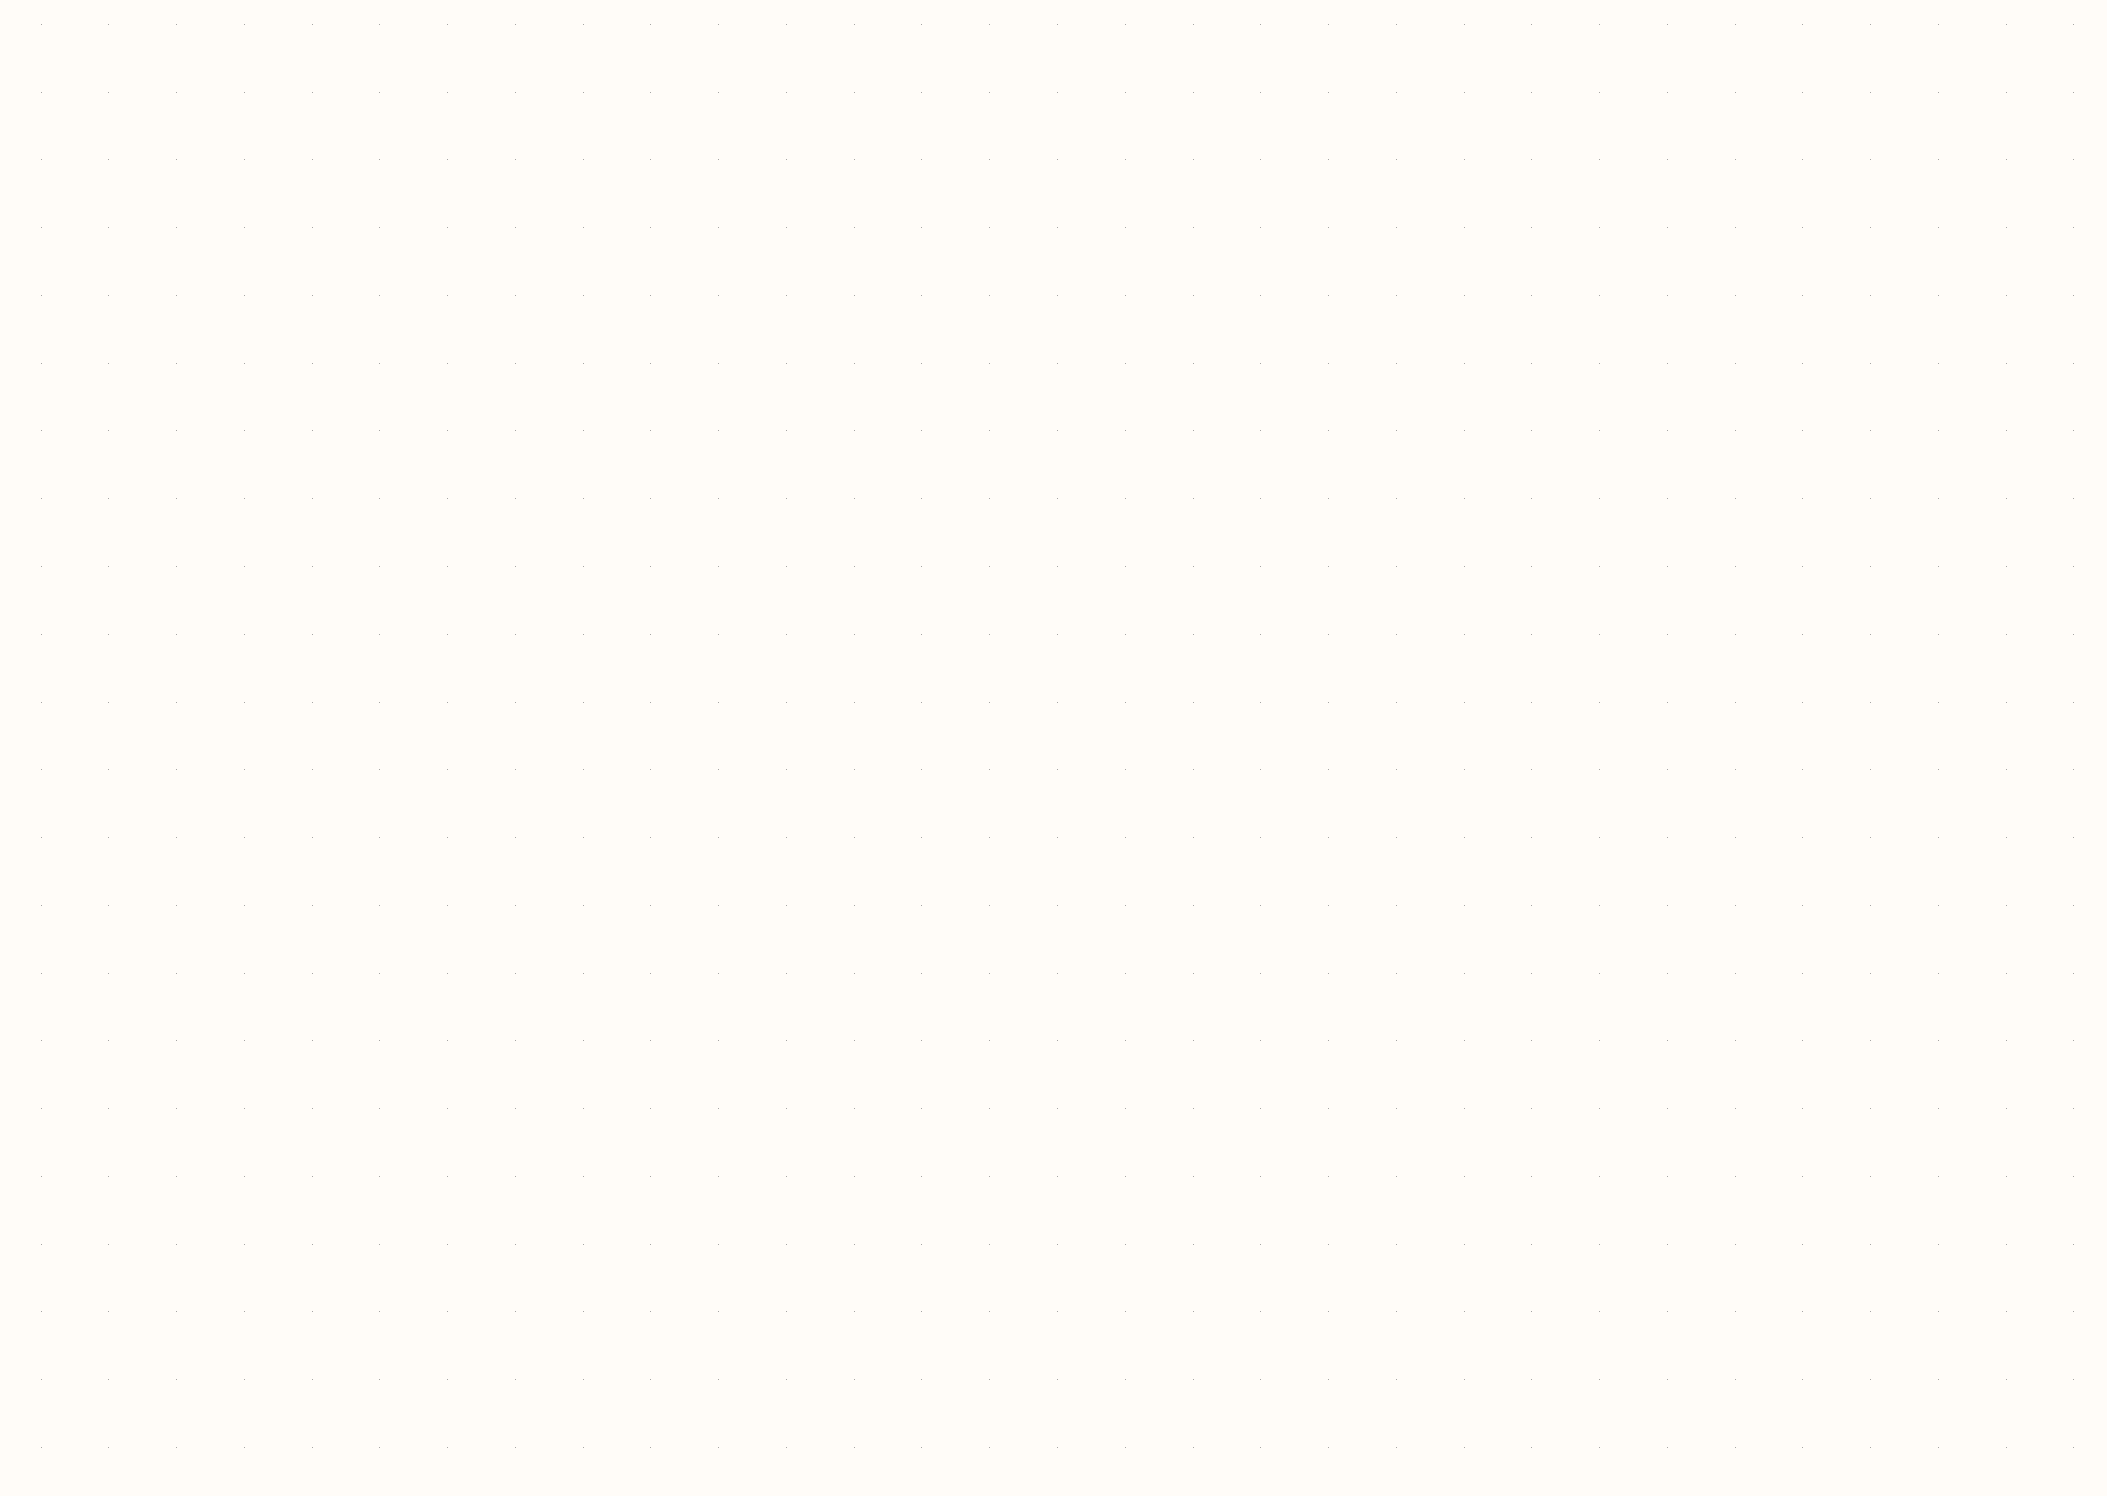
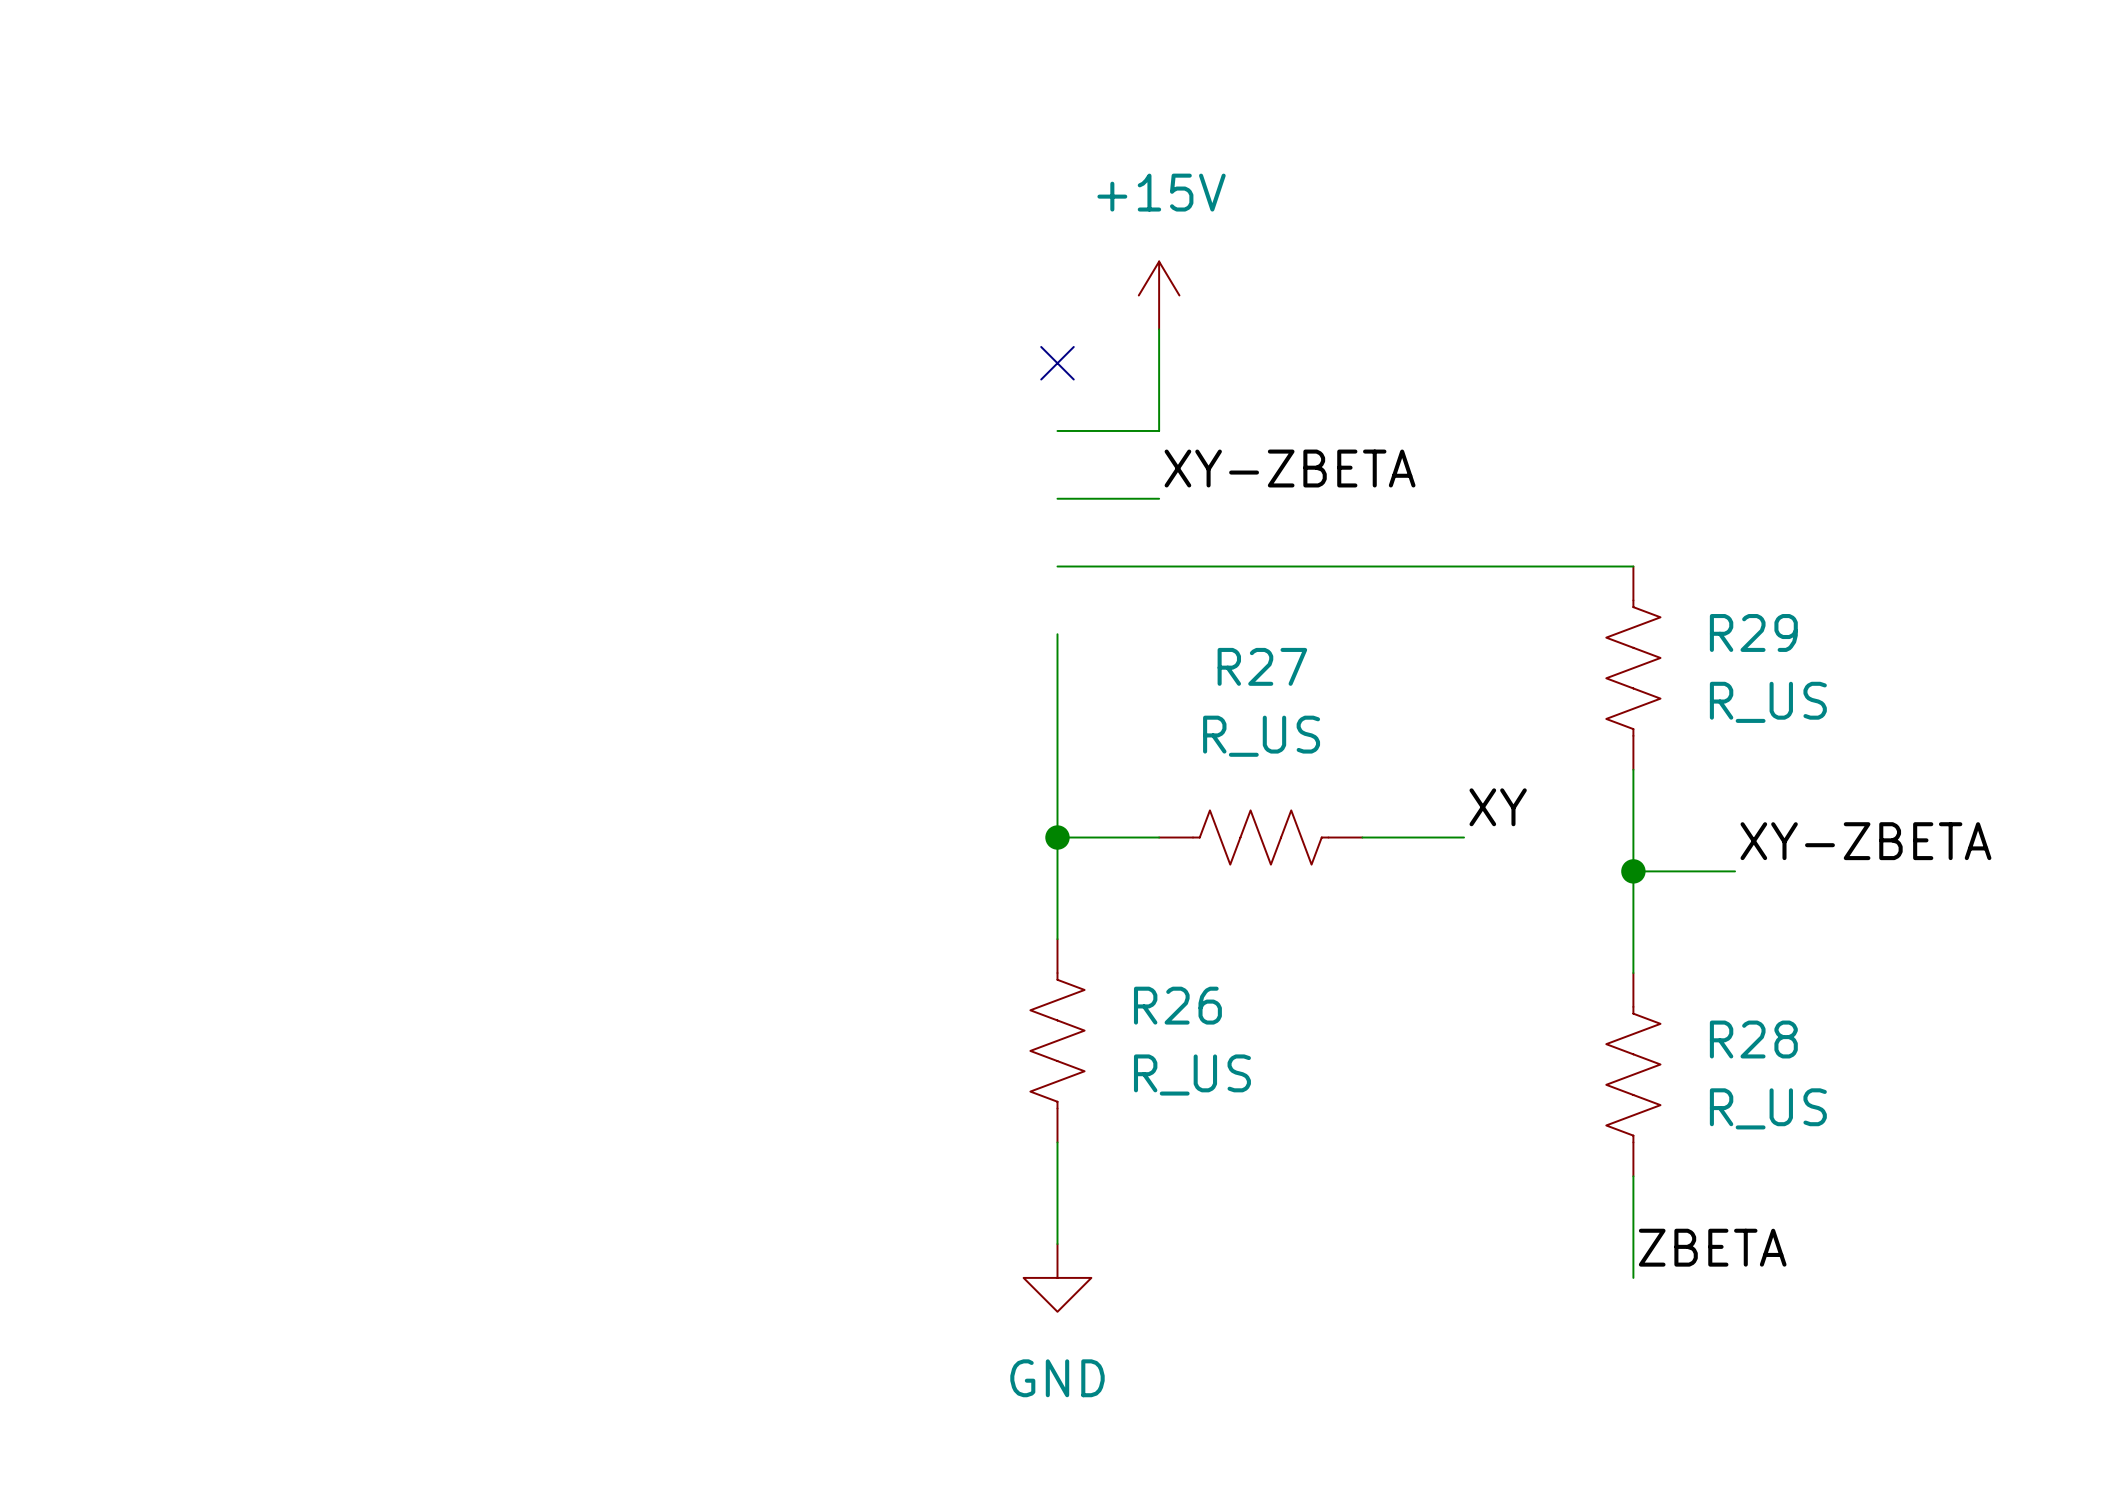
power symbol: none -> +15V (1159, 295)
wire: none -> (1159, 329) (1159, 430) (1057, 430)
no-connect mark: none -> (1057, 363)
label: none -> XY-ZBETA (1290, 468)
wire: none -> (1057, 498) (1159, 498)
wire: none -> (1057, 566) (1633, 566)
wire: none -> (1057, 634) (1057, 939)
R29: none -> R_US (1633, 668)
wire: none -> (1633, 769) (1633, 973)
label: none -> XY (1498, 807)
wire: none -> (1057, 837) (1159, 837)
junction: none -> (1057, 837)
R27: none -> R_US (1260, 837)
wire: none -> (1362, 837) (1464, 837)
label: none -> XY-ZBETA (1865, 841)
wire: none -> (1633, 871) (1735, 871)
junction: none -> (1633, 871)
R26: none -> R_US (1057, 1040)
R28: none -> R_US (1633, 1074)
wire: none -> (1057, 1142) (1057, 1244)
wire: none -> (1633, 1176) (1633, 1277)
label: none -> ZBETA (1712, 1247)
power symbol: none -> GND (1057, 1277)

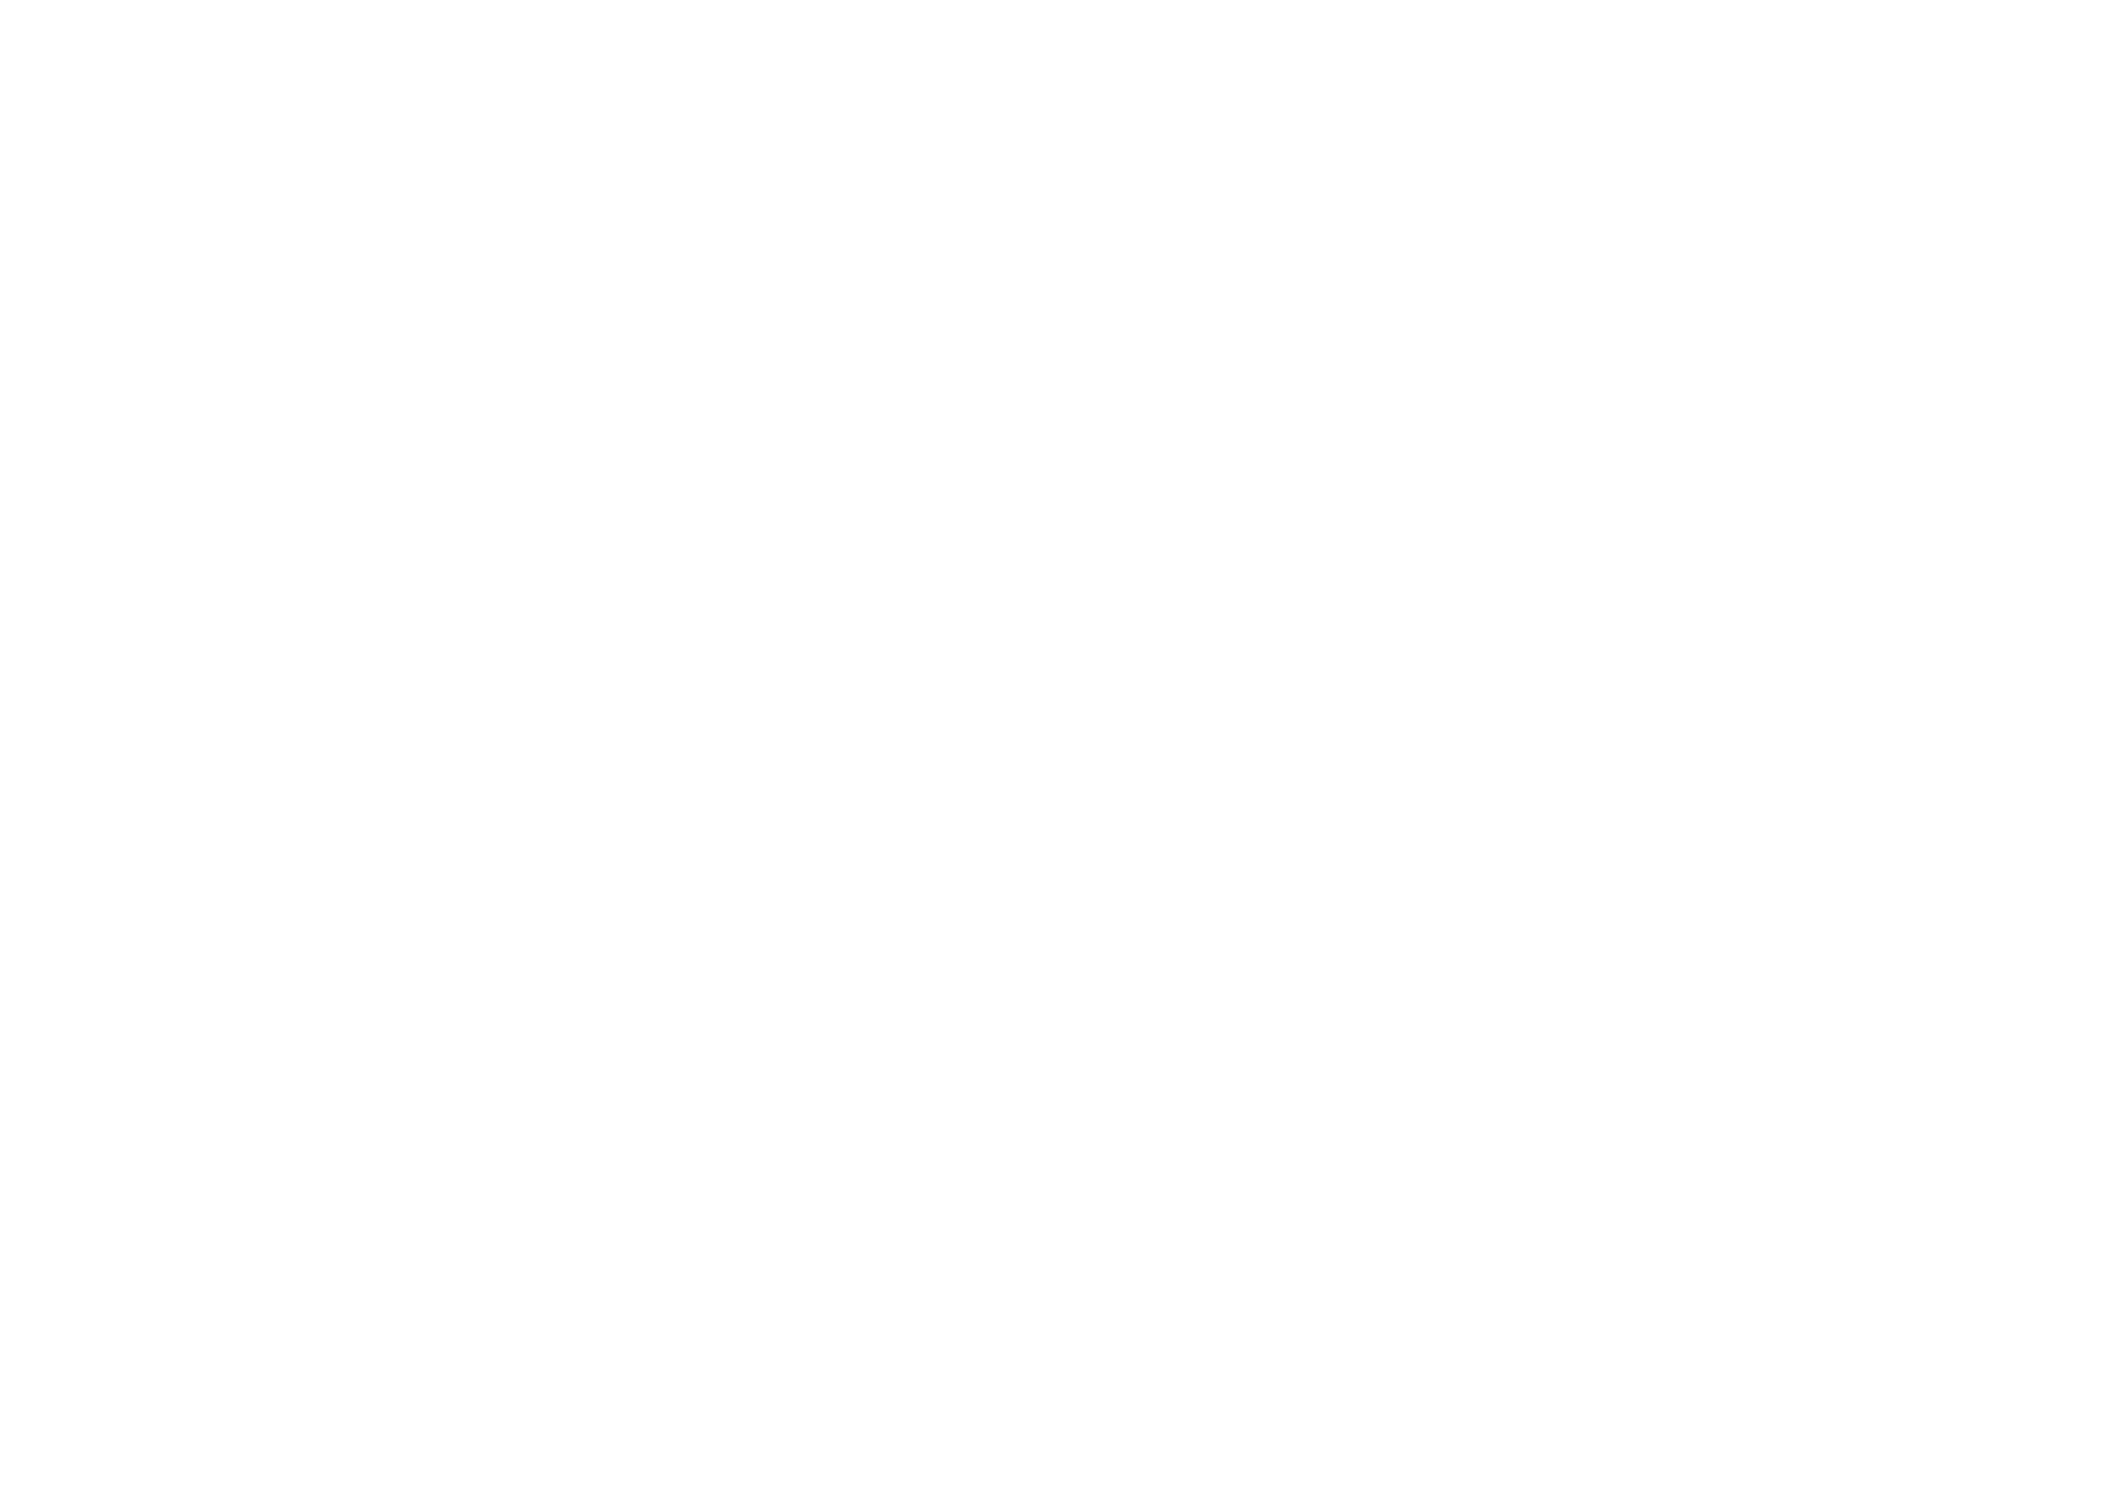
power symbol: +15V (1159, 295) -> none
wire: (1159, 329) (1159, 430) (1057, 430) -> none
no-connect mark: (1057, 363) -> none
label: XY-ZBETA (1290, 468) -> none
wire: (1057, 498) (1159, 498) -> none
wire: (1057, 566) (1633, 566) -> none
wire: (1057, 634) (1057, 939) -> none
R29: R_US (1633, 668) -> none
wire: (1633, 769) (1633, 973) -> none
label: XY (1498, 807) -> none
wire: (1057, 837) (1159, 837) -> none
junction: (1057, 837) -> none
R27: R_US (1260, 837) -> none
wire: (1362, 837) (1464, 837) -> none
label: XY-ZBETA (1865, 841) -> none
wire: (1633, 871) (1735, 871) -> none
junction: (1633, 871) -> none
R26: R_US (1057, 1040) -> none
R28: R_US (1633, 1074) -> none
wire: (1057, 1142) (1057, 1244) -> none
wire: (1633, 1176) (1633, 1277) -> none
label: ZBETA (1712, 1247) -> none
power symbol: GND (1057, 1277) -> none

